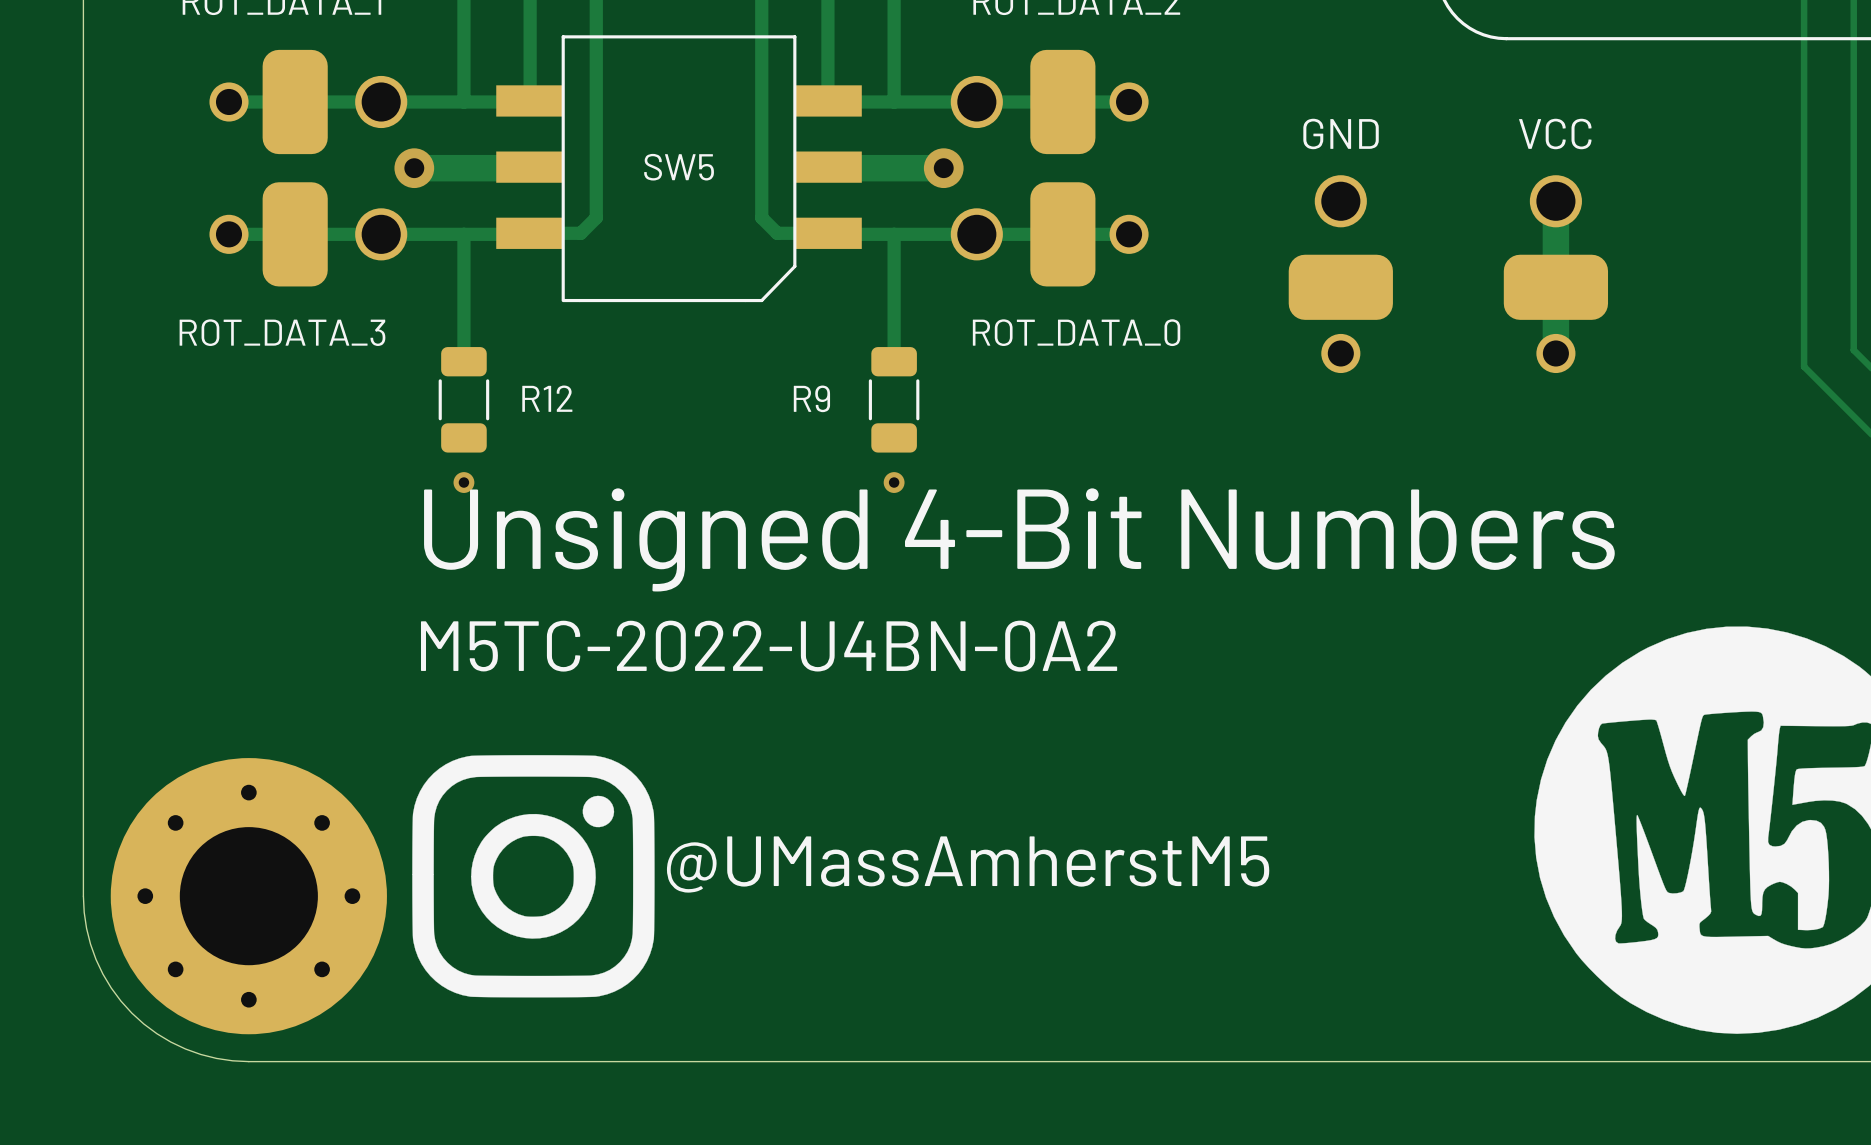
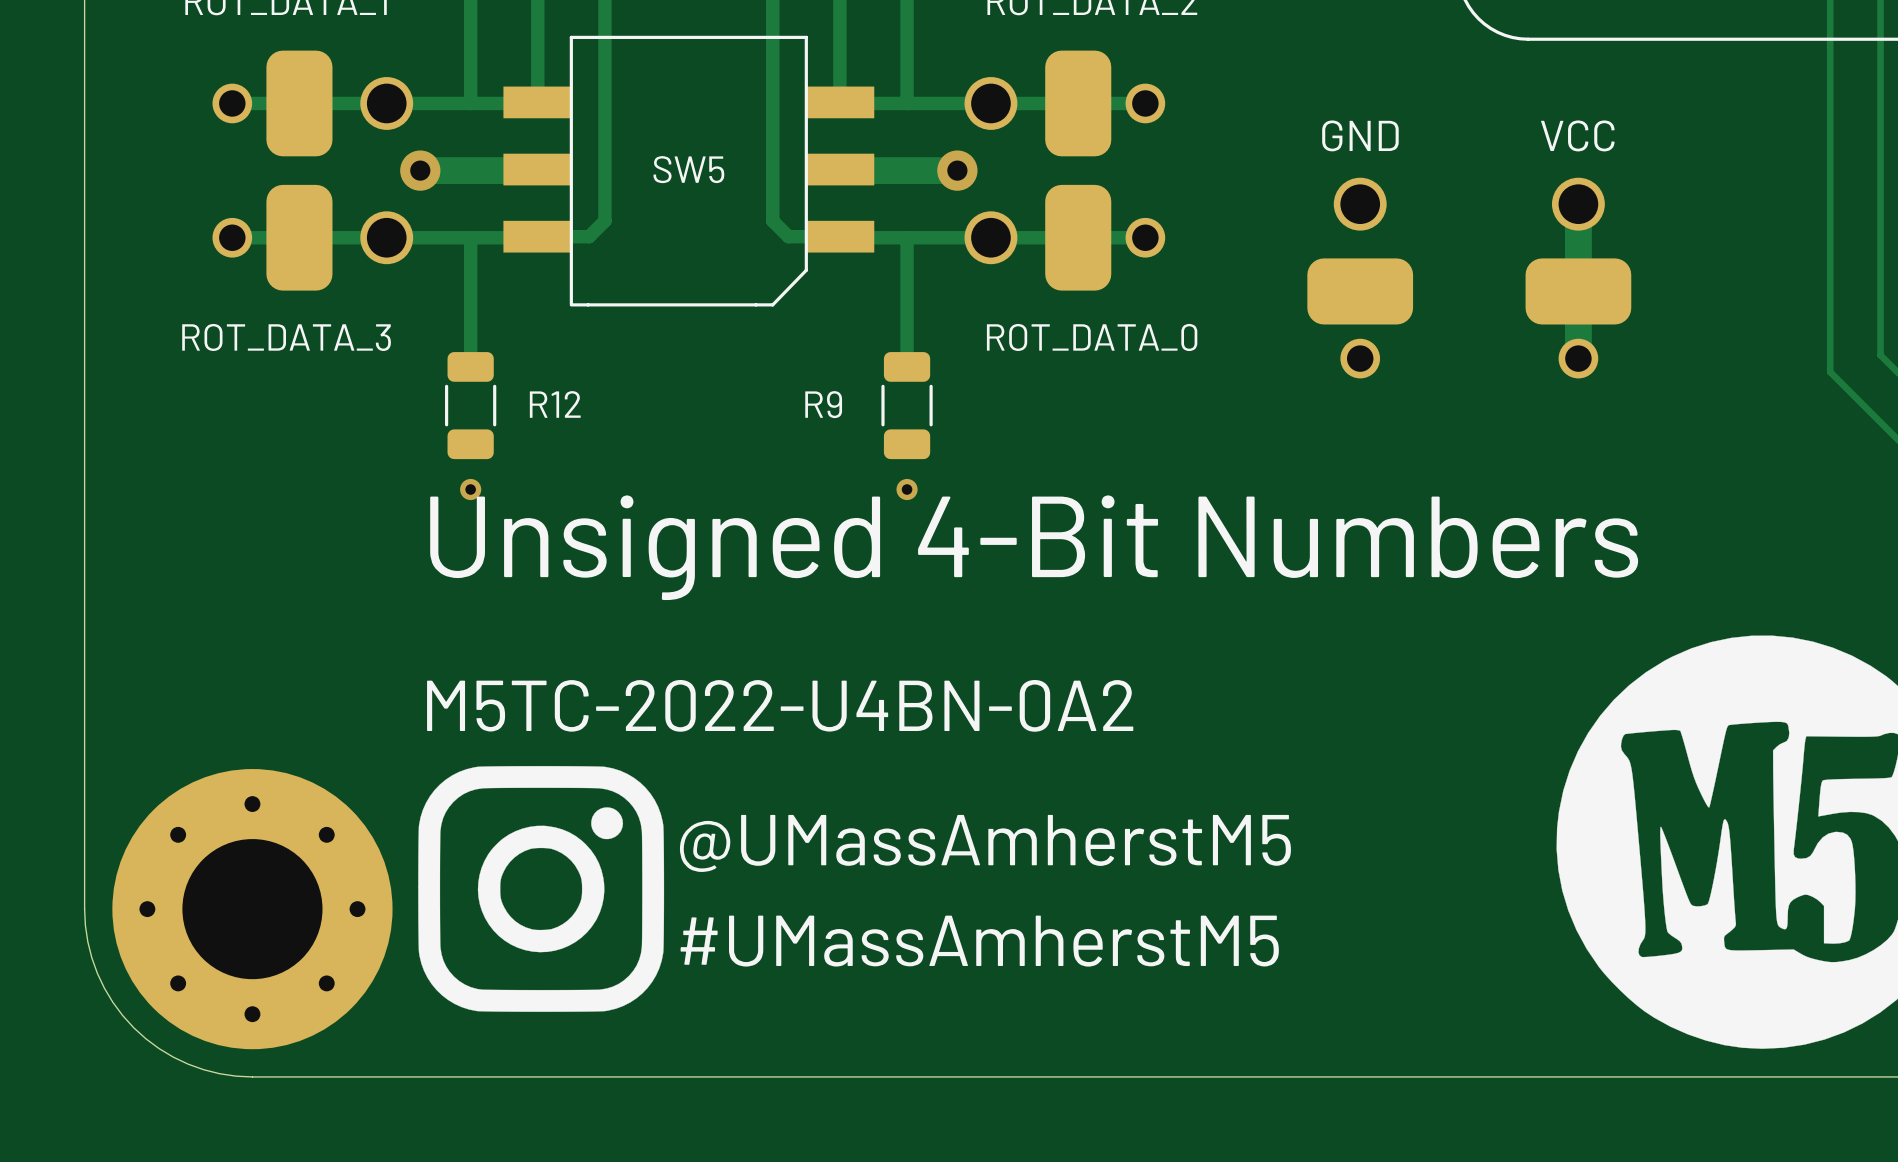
text position: M5TC-2022-U4BN-0A2 (769, 646) -> M5TC-2022-U4BN-0A2 (780, 705)
text position: @UMassAmherstM5 (968, 864) -> @UMassAmherstM5 (985, 843)
text: none -> #UMassAmherstM5 (979, 941)

